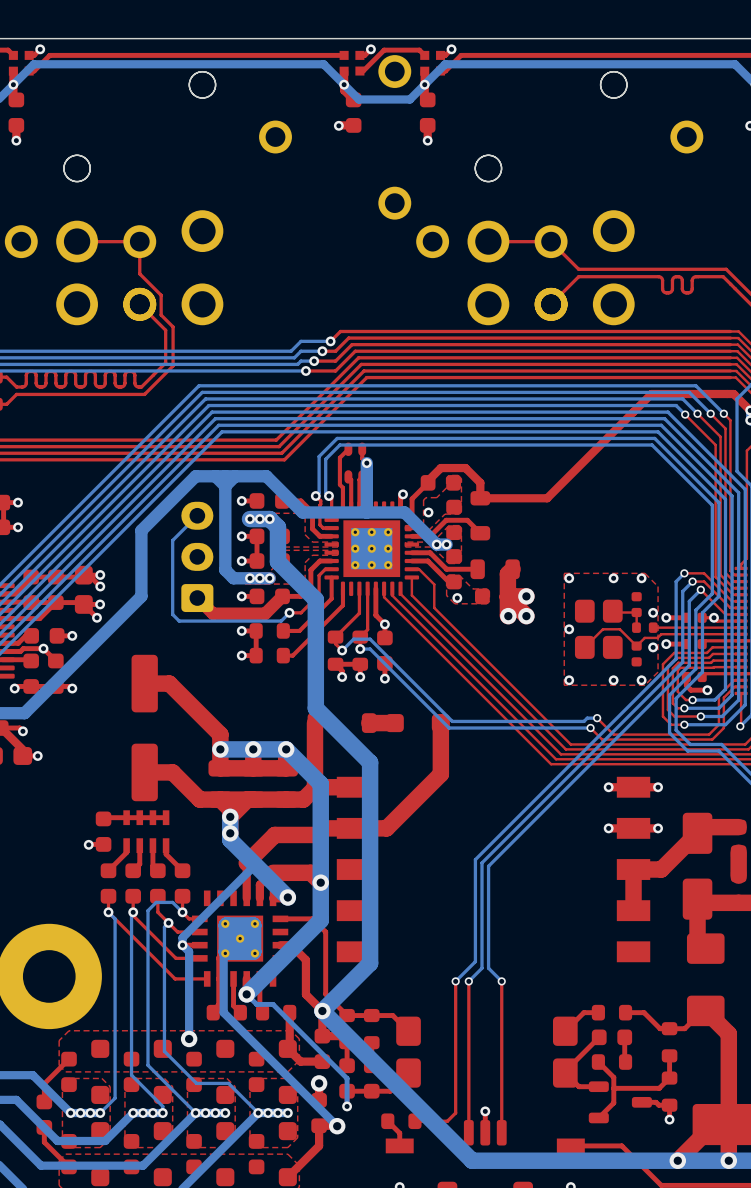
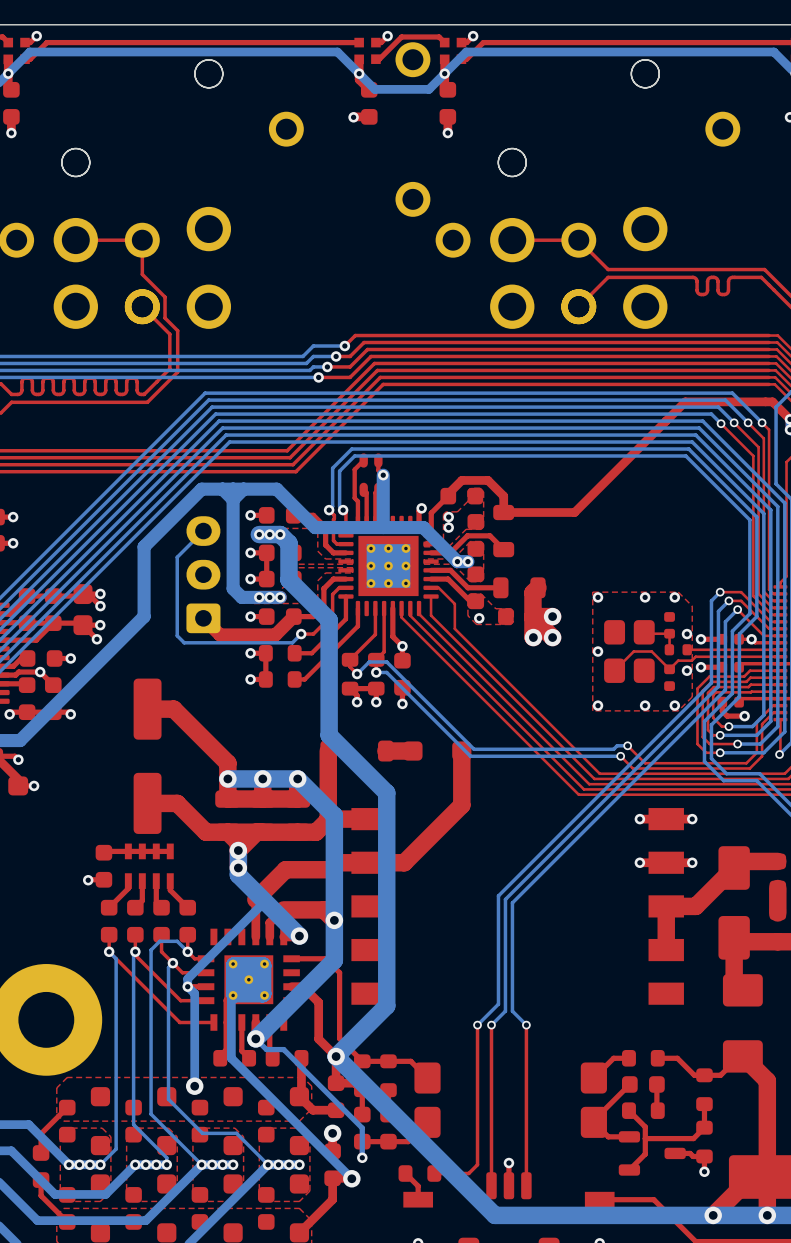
via: none -> (448, 517)

